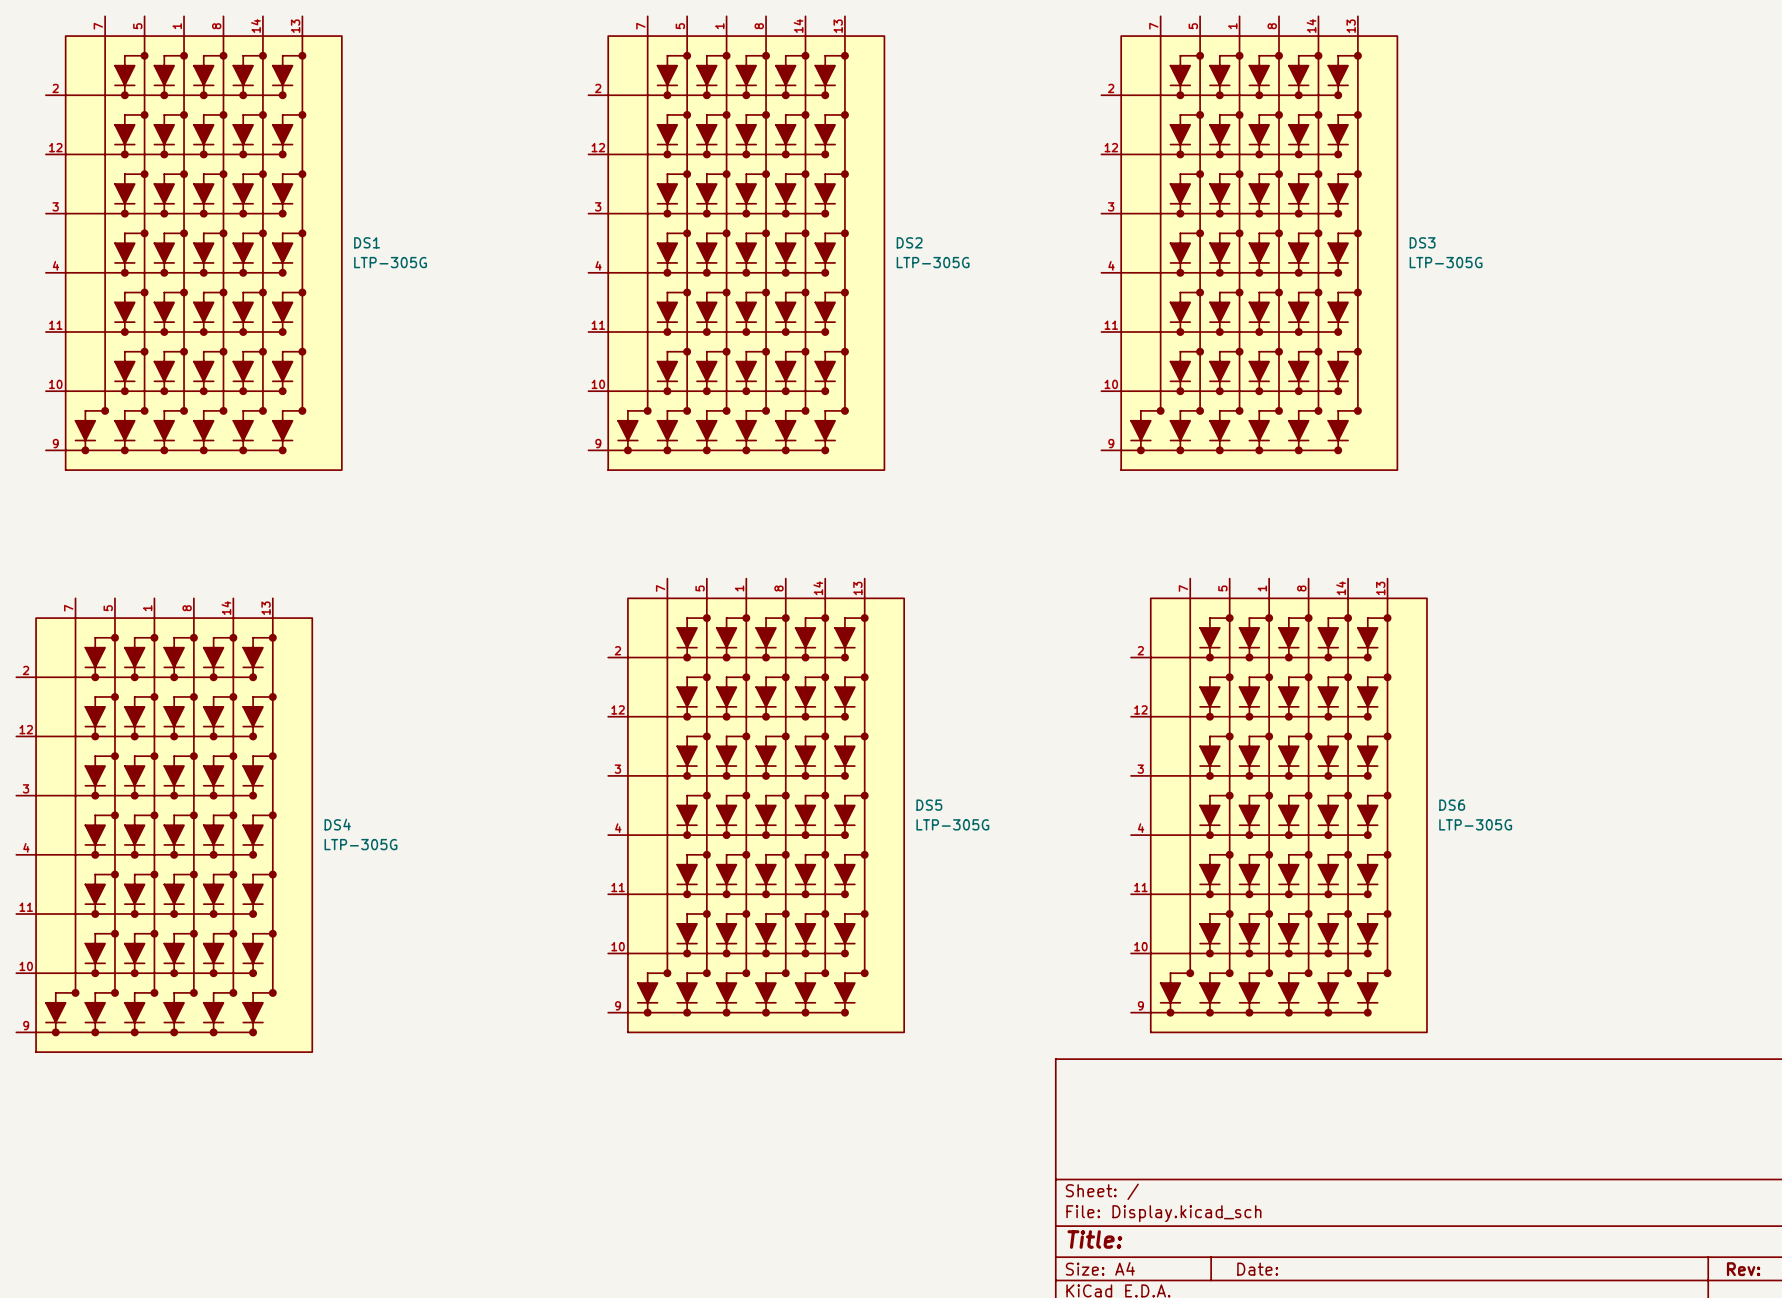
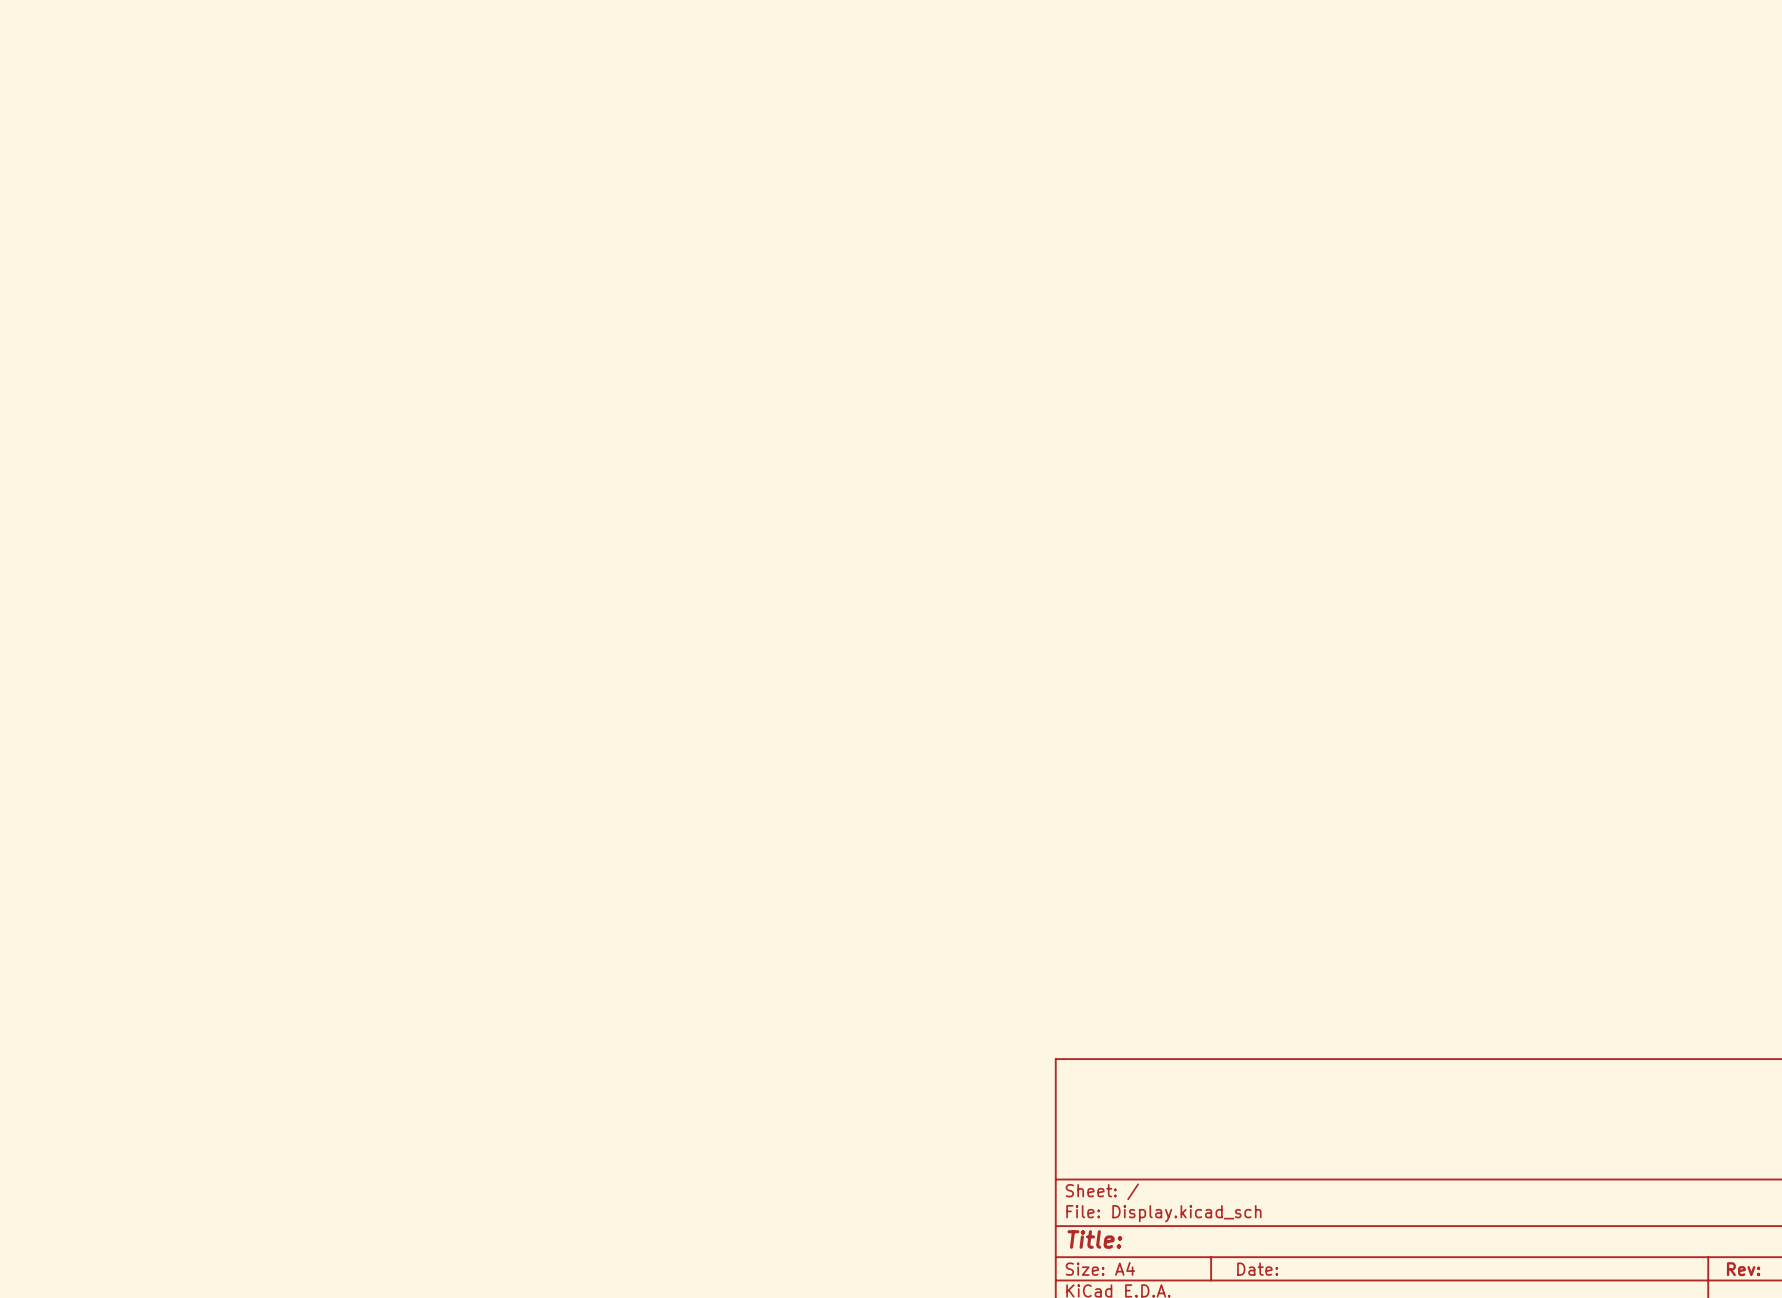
DS1: LTP-305G (194, 243) -> none
DS2: LTP-305G (736, 243) -> none
DS3: LTP-305G (1249, 243) -> none
DS5: LTP-305G (756, 805) -> none
DS6: LTP-305G (1279, 805) -> none
DS4: LTP-305G (164, 825) -> none

